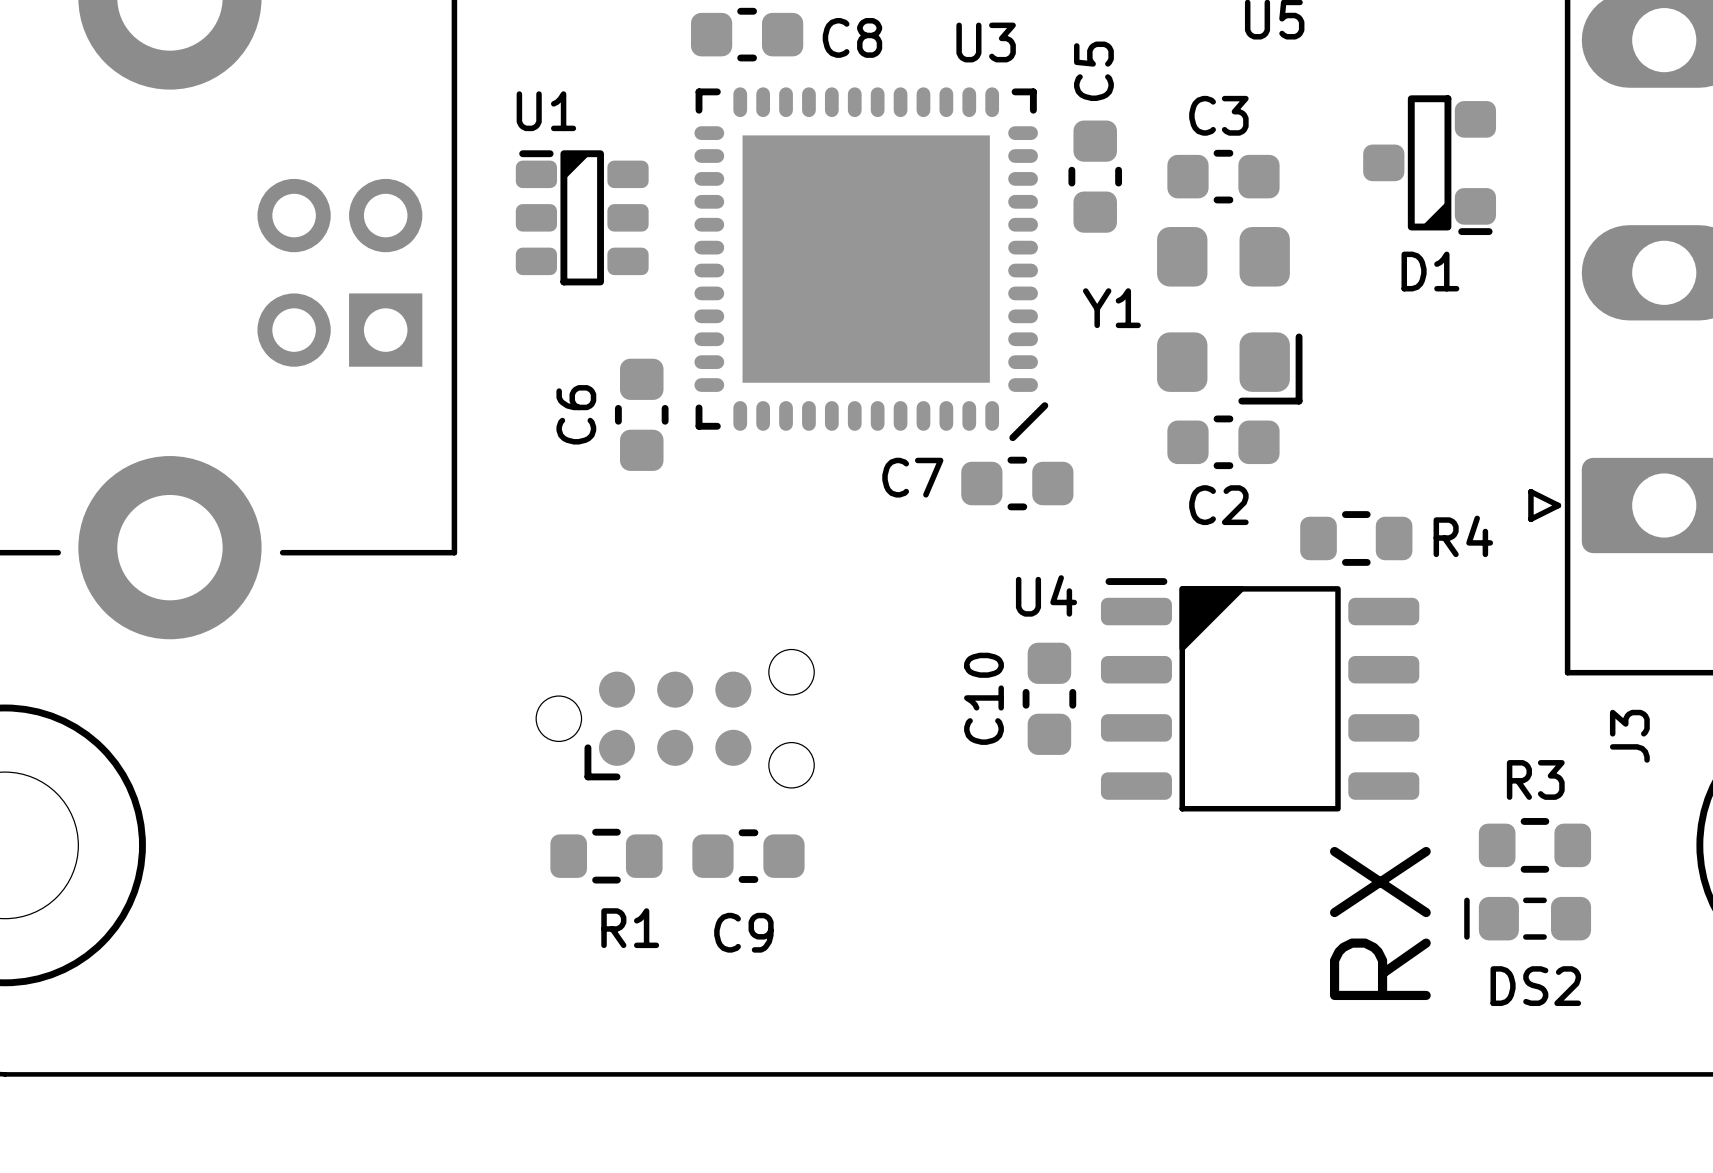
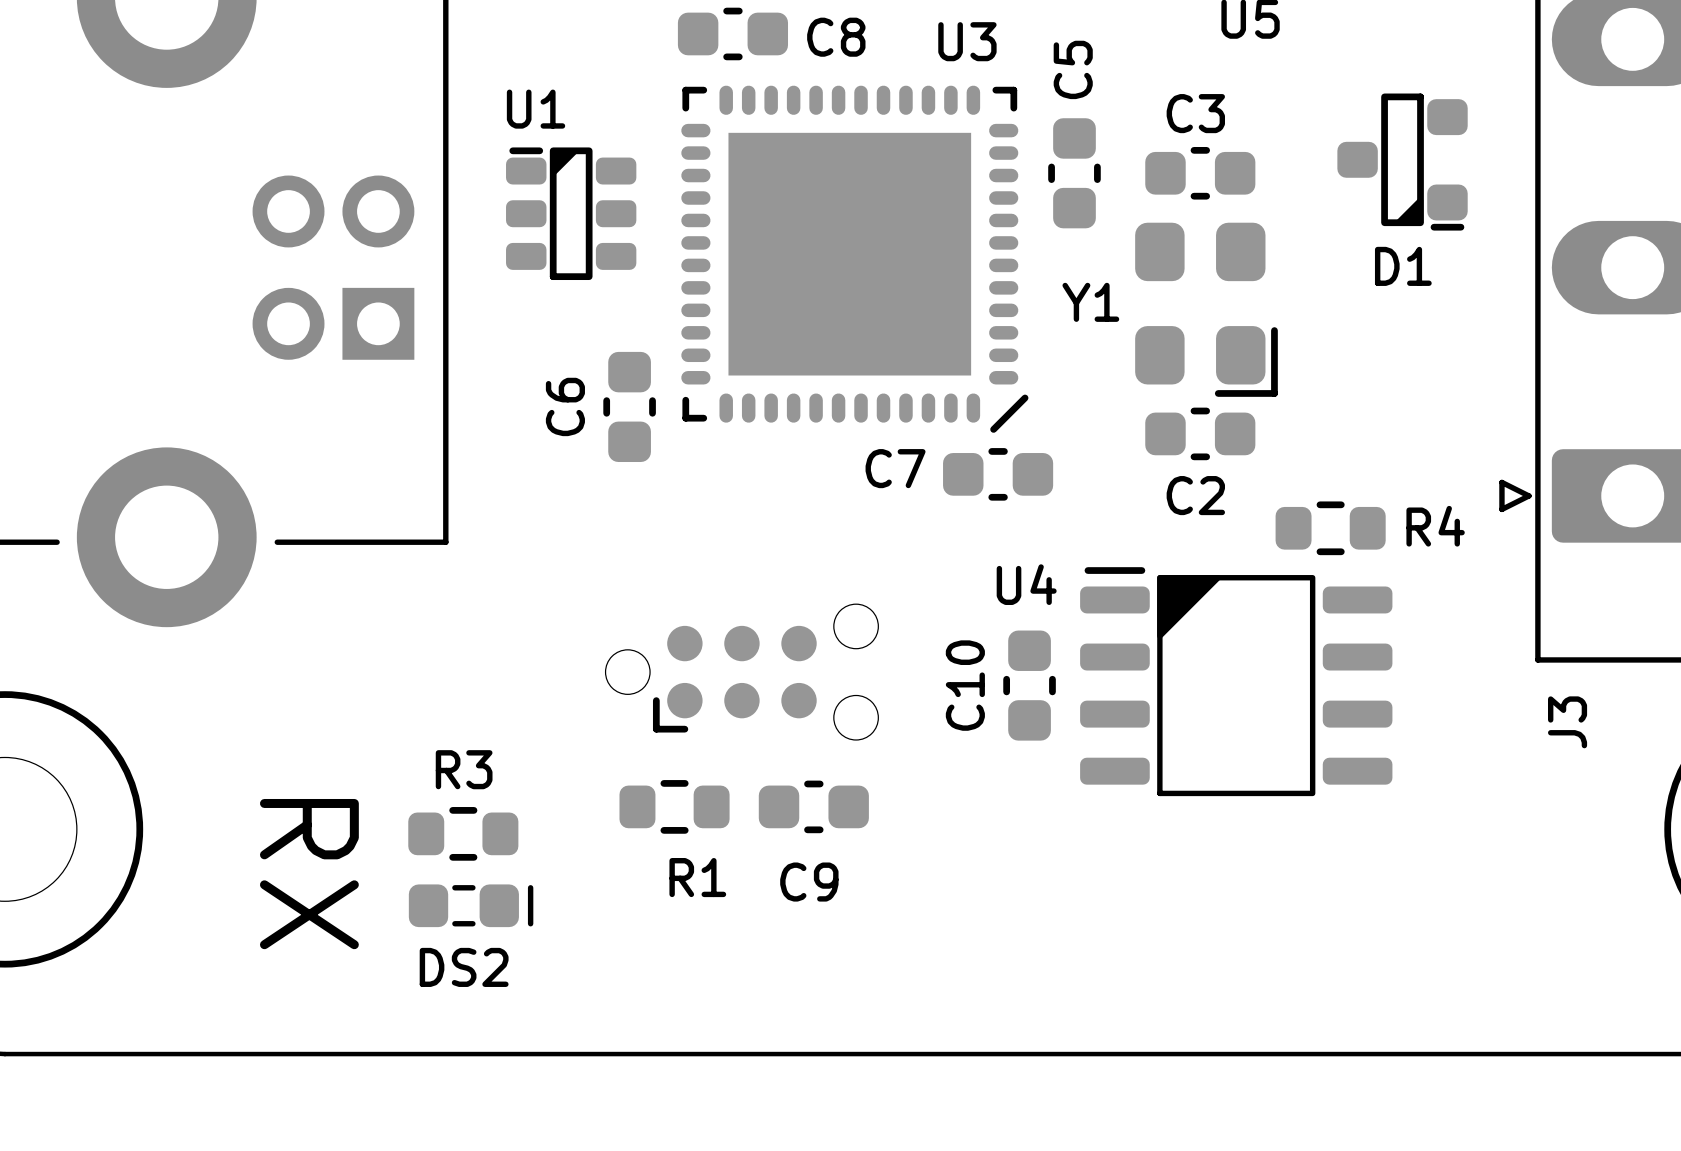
part position: (675, 718) -> (741, 672)
J3 name position: J3 (1629, 736) -> J3 (1567, 722)
R3 position: (1534, 845) -> (463, 833)
R1 position: (606, 856) -> (674, 806)
C9 position: (748, 856) -> (813, 806)
DS2 rotation: 0° (1527, 918) -> 180° (471, 905)
DS2 position: (1527, 918) -> (471, 905)
text rotation: 0° (1380, 923) -> 180° (309, 874)
text position: RX (1380, 923) -> RX (309, 874)

